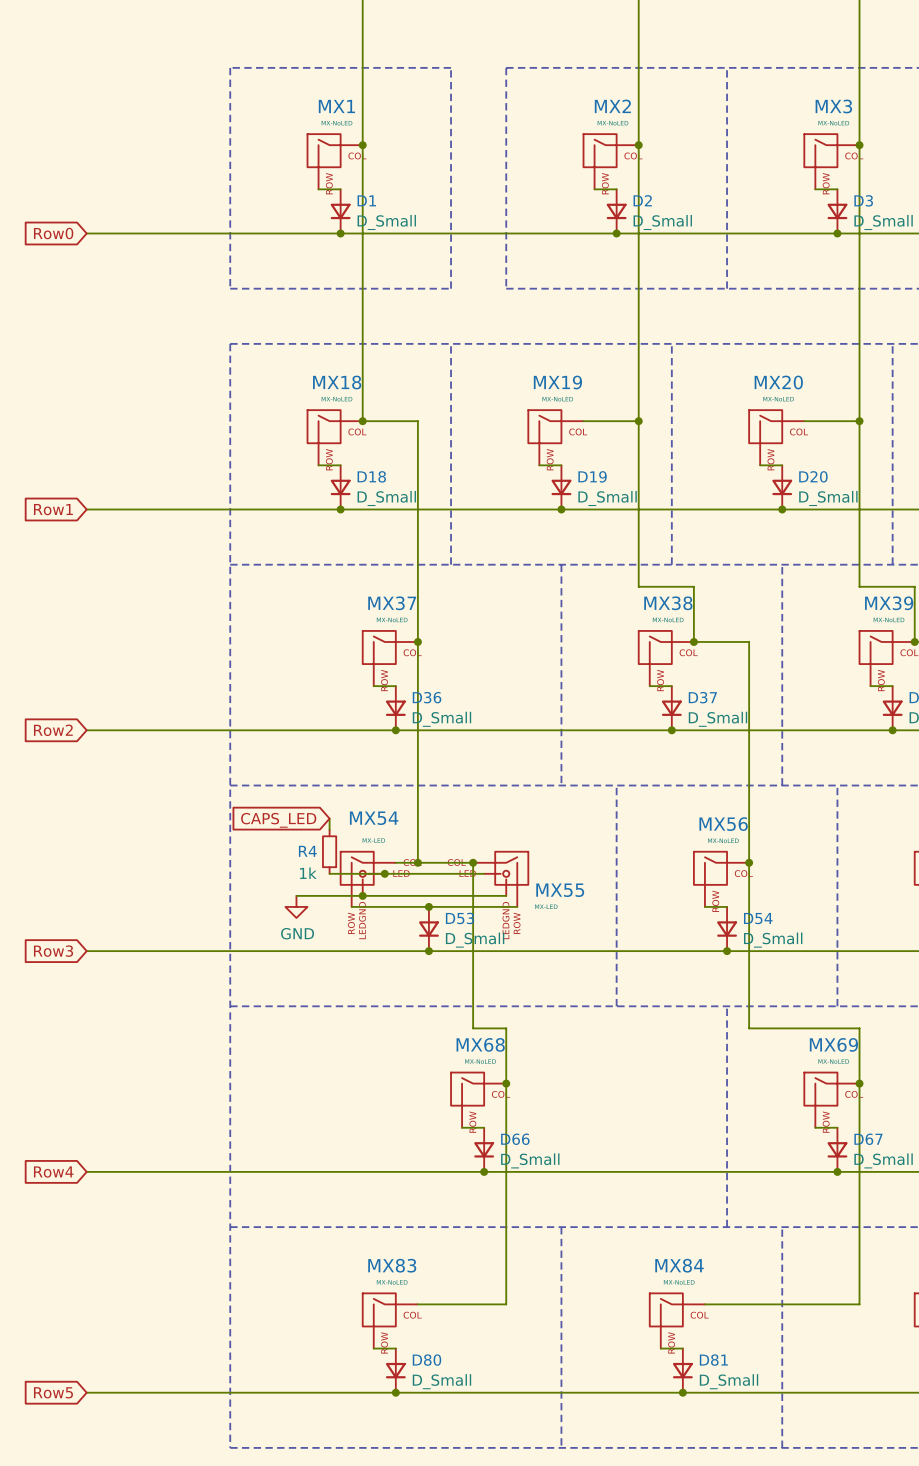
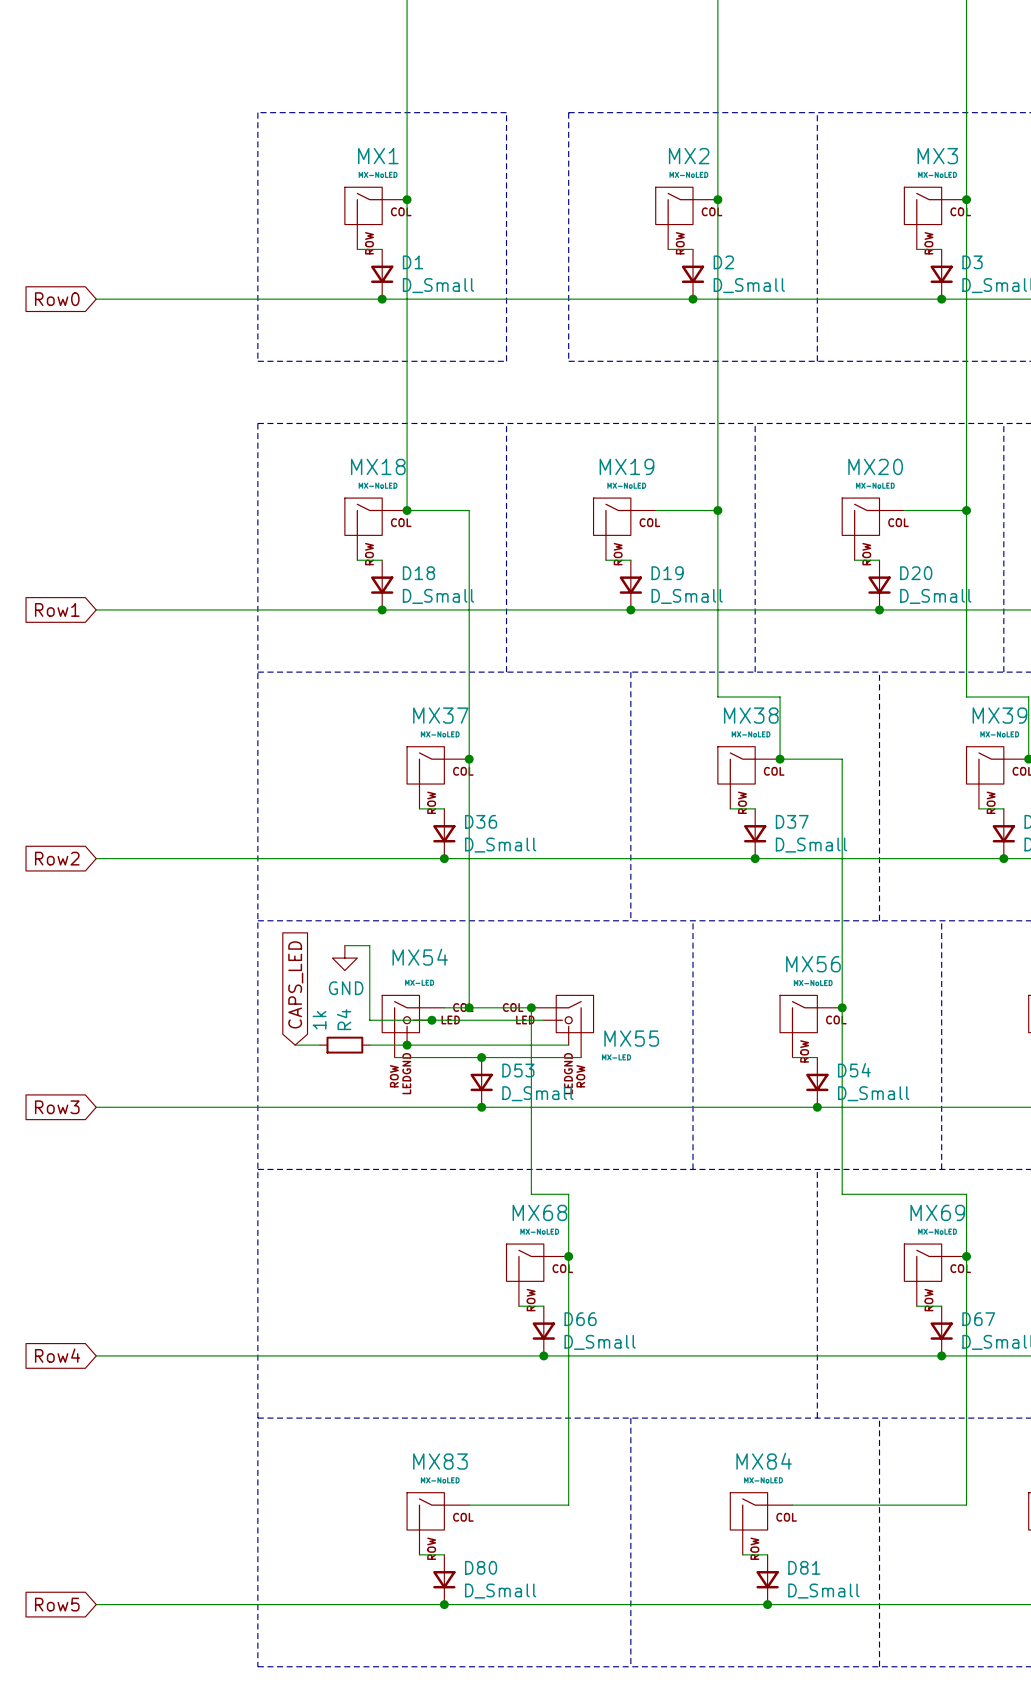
wire: none -> (344, 945) (369, 945) (369, 958)
global label rotation: 0° (278, 820) -> 90° clockwise (295, 984)
wire: none -> (369, 970) (369, 1020)
R4 rotation: 0° (329, 851) -> 90° clockwise (344, 1045)
R4 position: (329, 851) -> (344, 1045)
wire: none -> (295, 1045) (320, 1045)
wire: (296, 895) (329, 895) -> none
power symbol position: GND (296, 906) -> GND (344, 958)

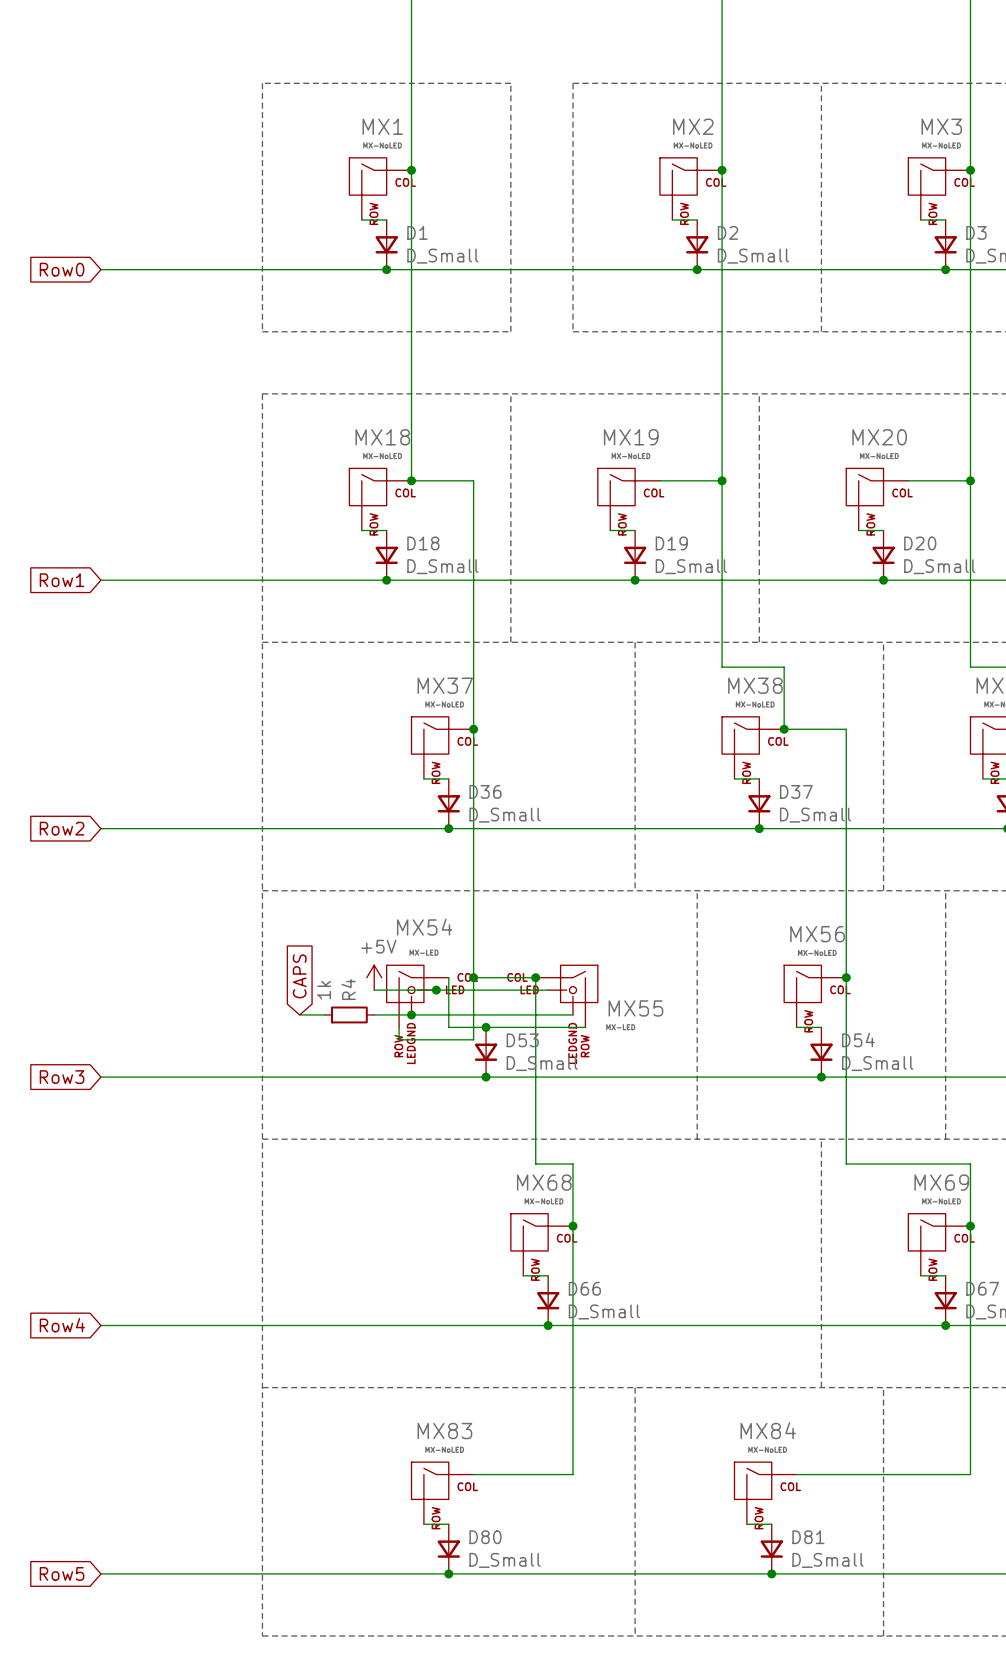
wire: (344, 945) (369, 945) (369, 1020) -> none
power symbol: GND (344, 958) -> none
global label: CAPS_LED (295, 984) -> CAPS (299, 976)
power symbol: none -> +5V (374, 977)
wire: (444, 1007) (469, 1007) -> (448, 977) (448, 1027)
wire: (394, 1057) (444, 1057) -> (399, 1027) (399, 1039) (473, 1039) (473, 977)

